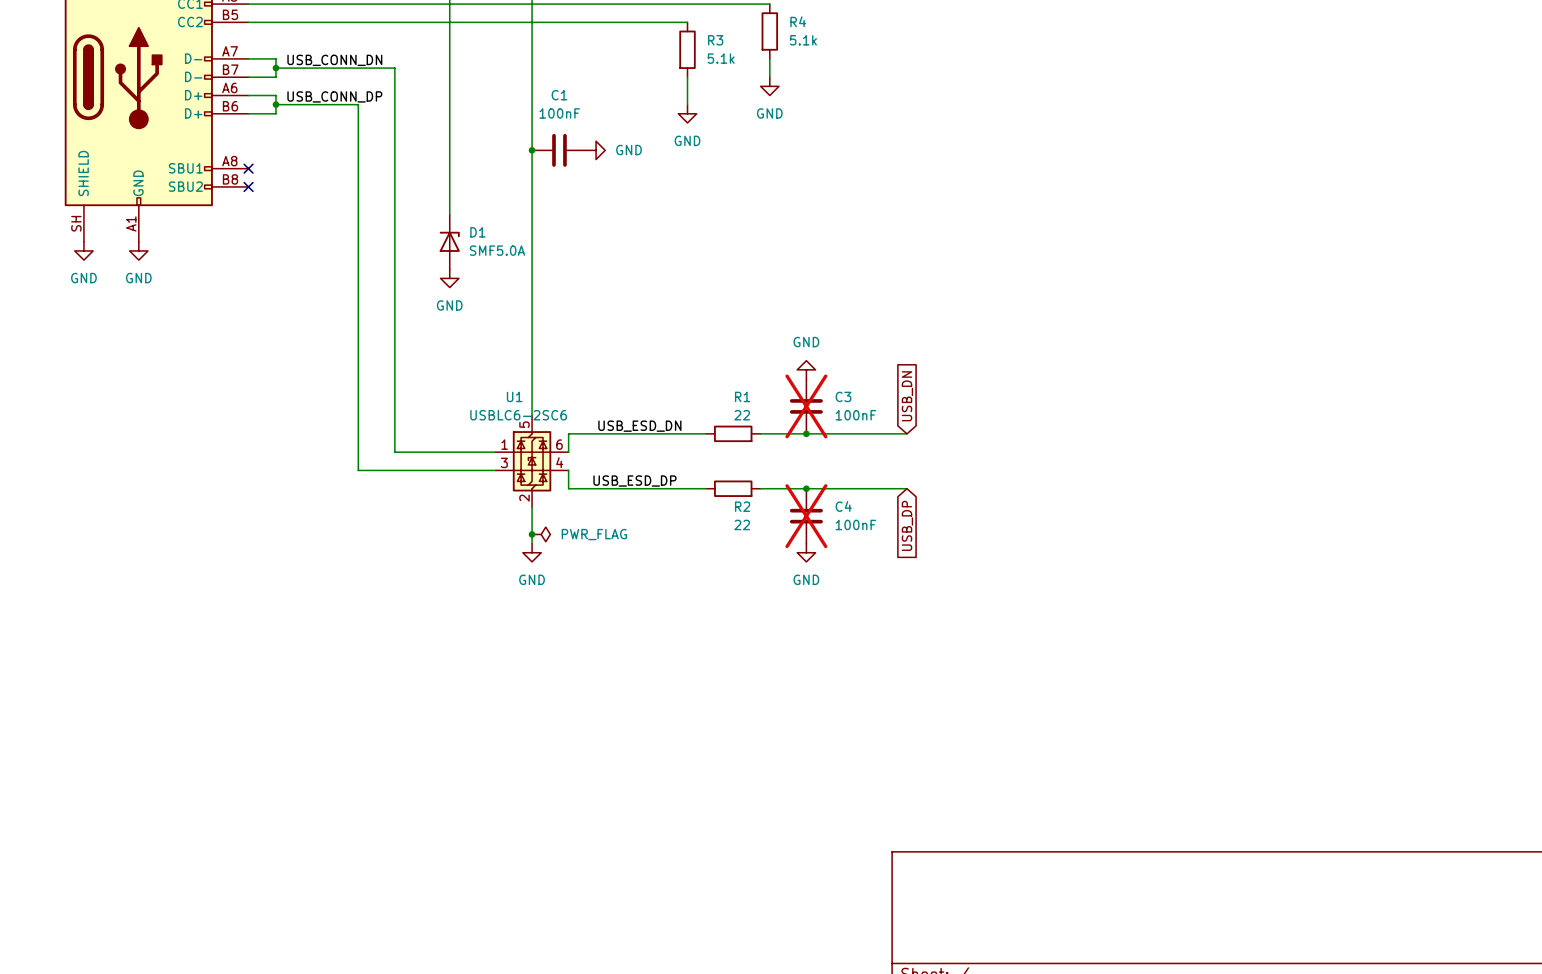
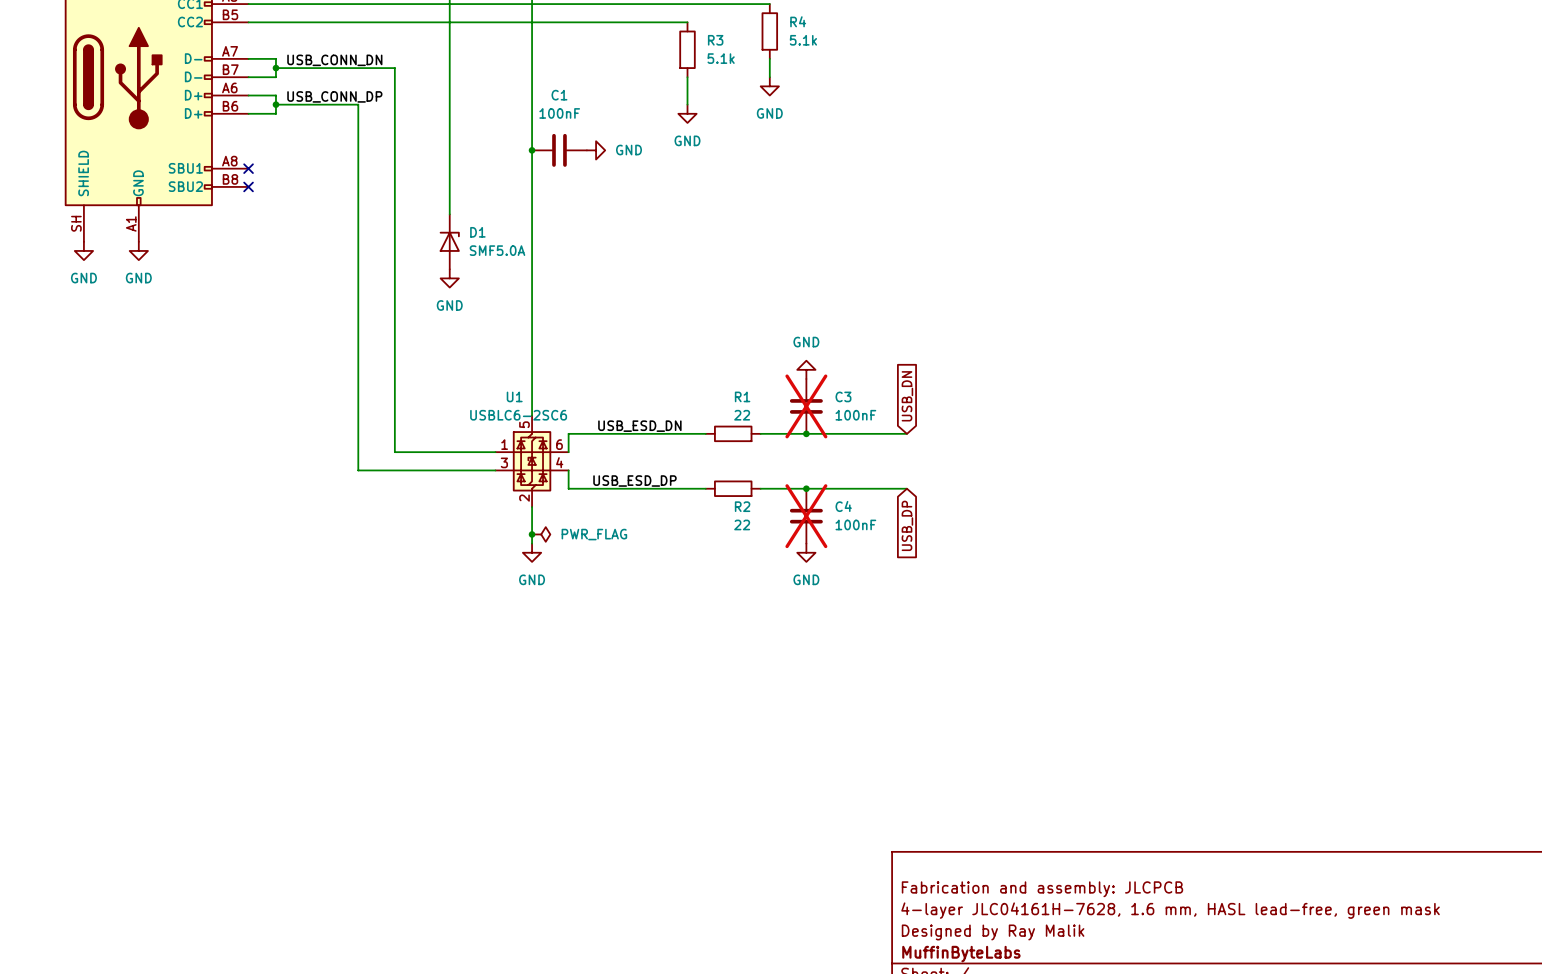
title block: none -> Fabrication and assembly: JLCPCB (1042, 889)
title block: none -> 4-layer JLC04161H-7628, 1.6 mm, HASL lead-free, green mask (1170, 910)
title block: none -> Designed by Ray Malik (993, 932)
title block: none -> MuffinByteLabs (961, 954)

